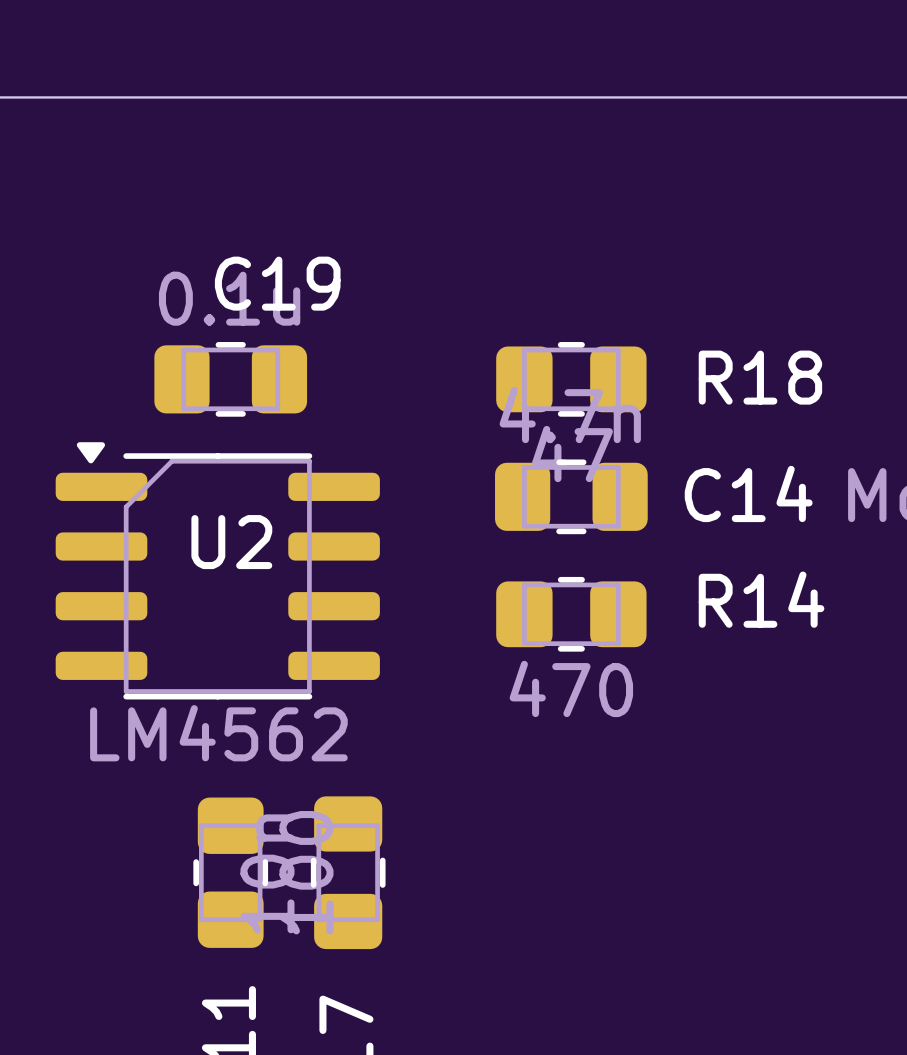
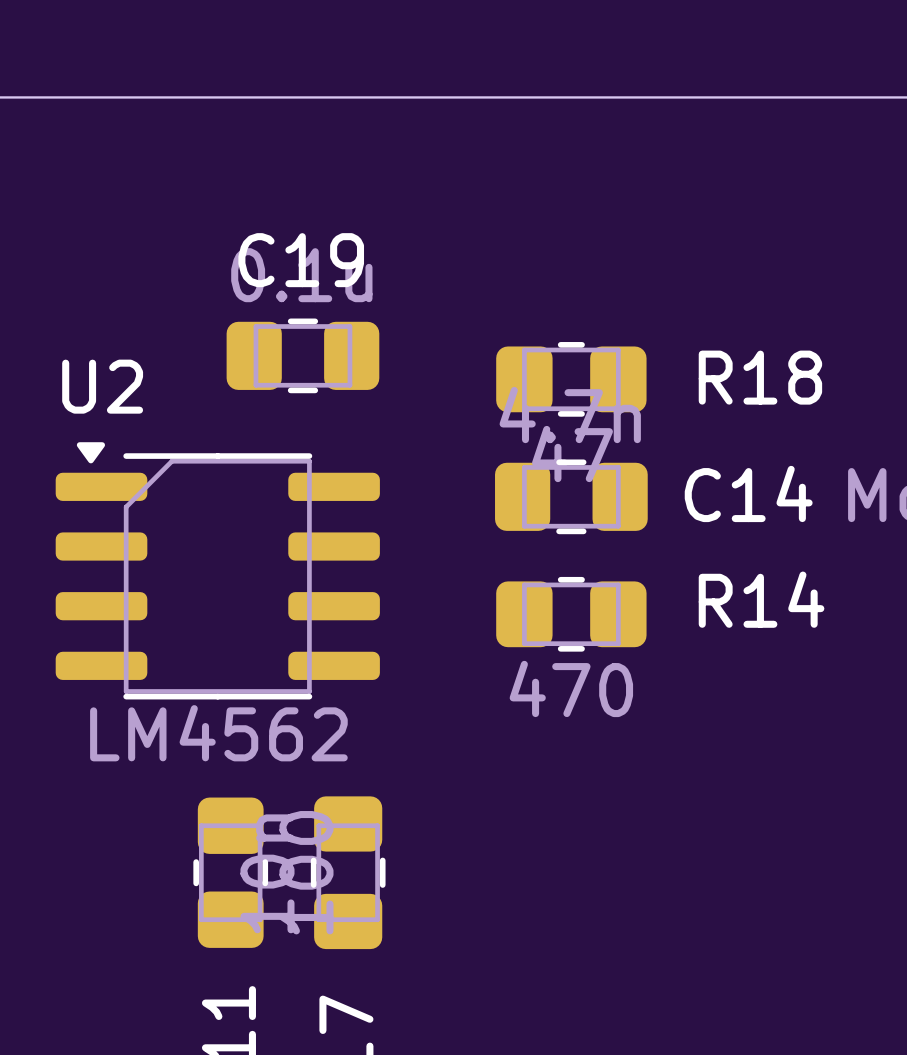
C19 name position: C19 (277, 283) -> C19 (301, 260)
C19 position: (230, 379) -> (302, 355)
U2 name position: U2 (231, 542) -> U2 (102, 386)

